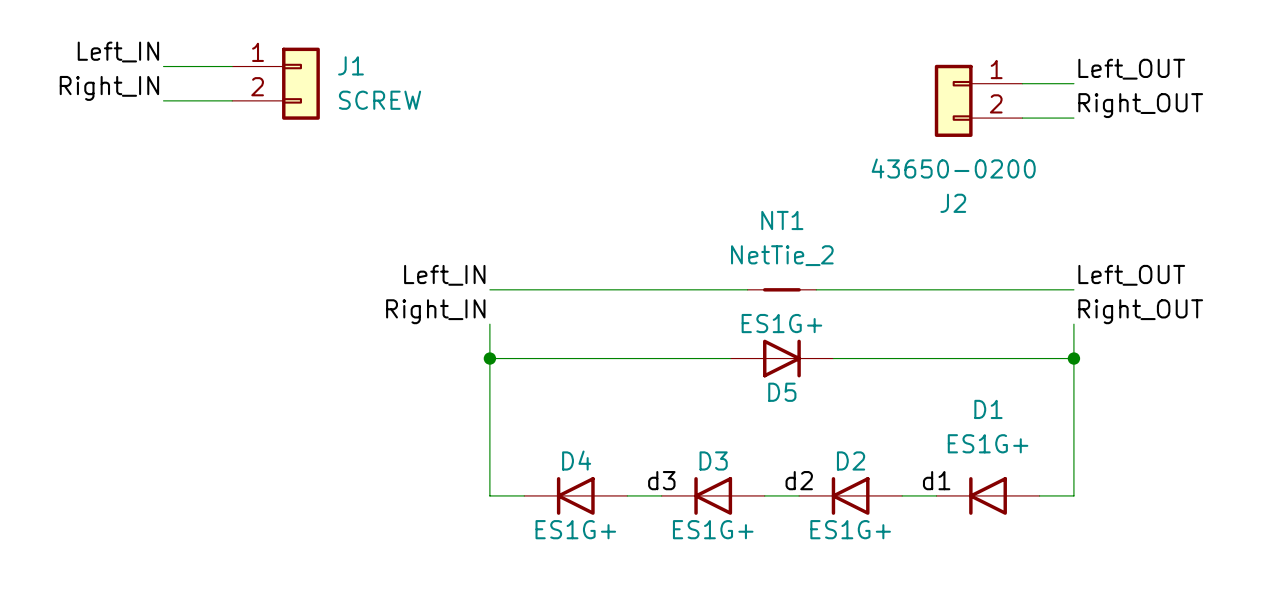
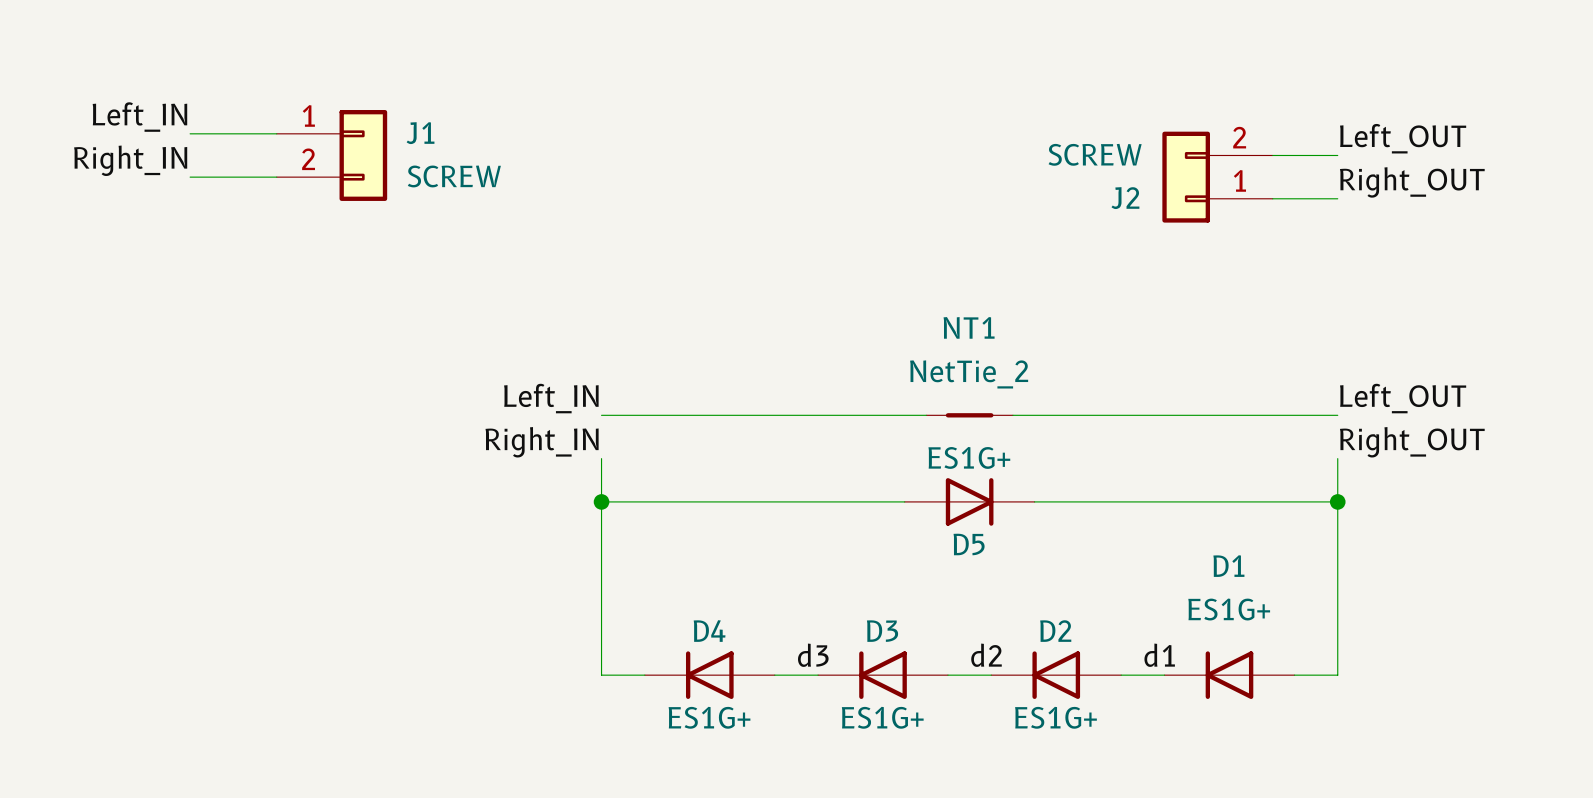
J2 flip: as is (953, 100) -> up-down (1186, 177)
J2 value: 43650-0200 (953, 168) -> SCREW (1095, 154)
J2 name position: J2 (953, 203) -> J2 (1125, 198)

